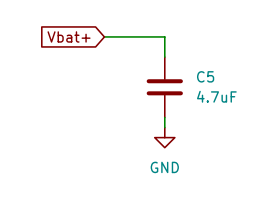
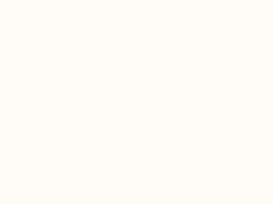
global label: Vbat+ (69, 36) -> none
wire: (104, 36) (164, 36) (164, 57) -> none
C5: 4.7uF (164, 87) -> none
wire: (164, 117) (164, 127) -> none
power symbol: GND (164, 137) -> none

